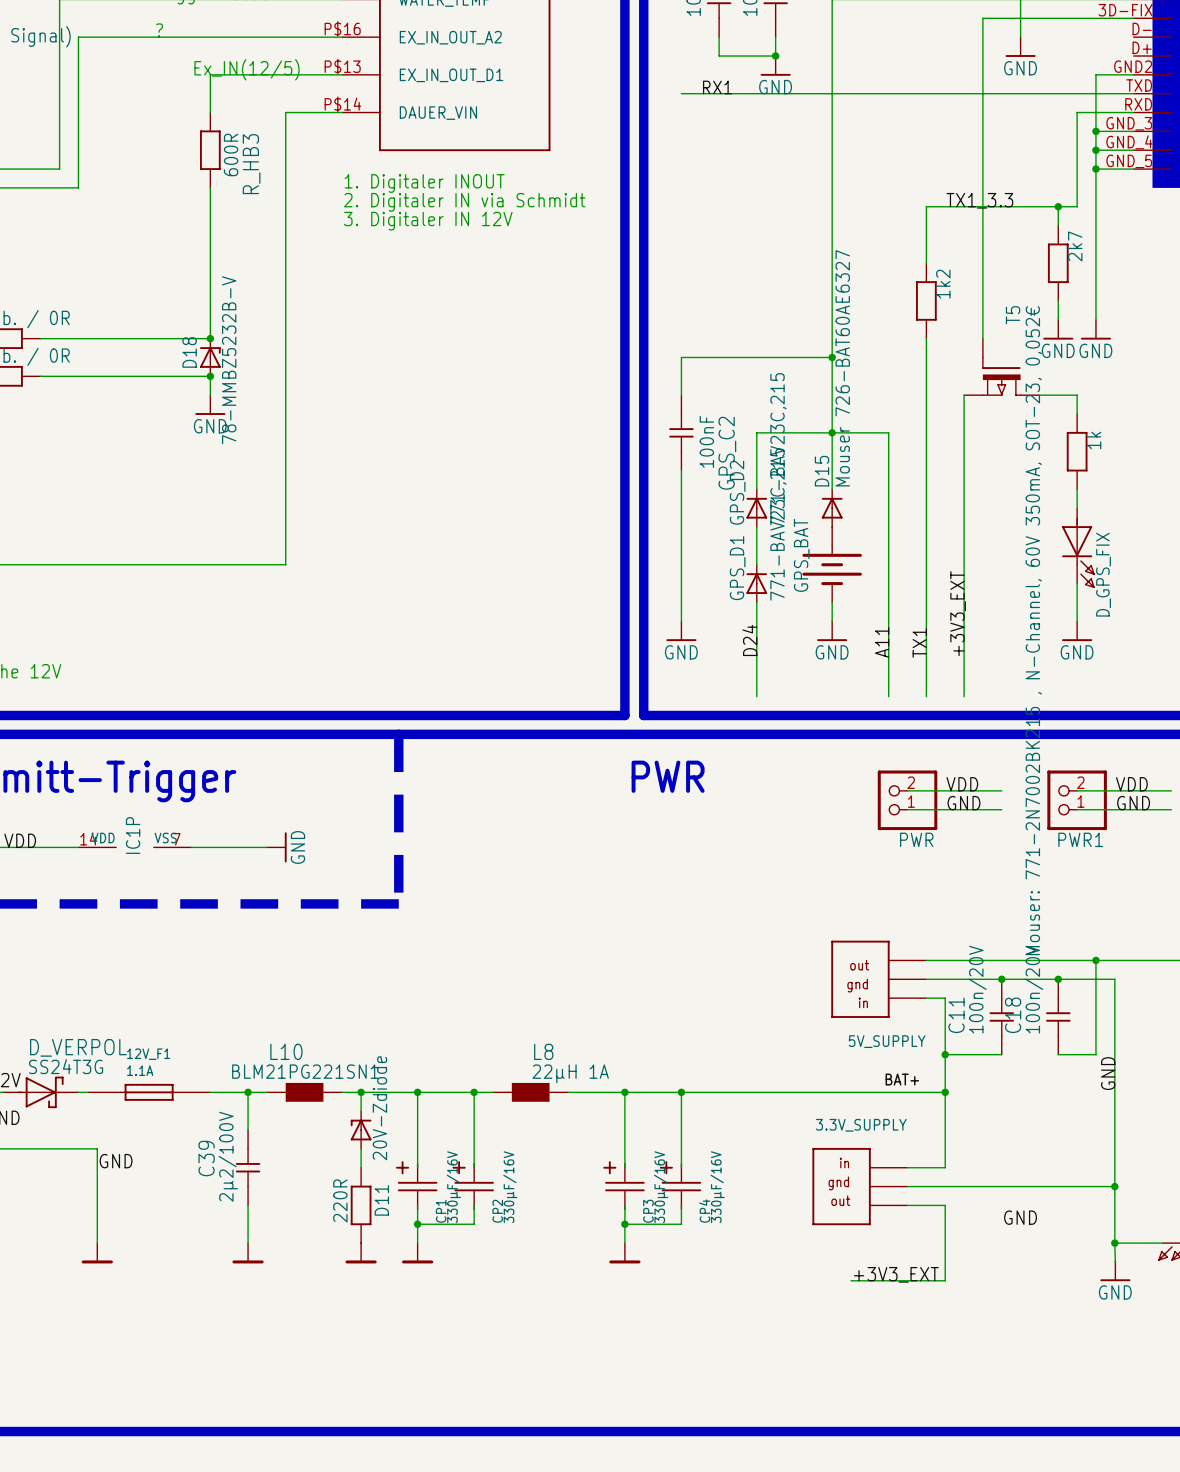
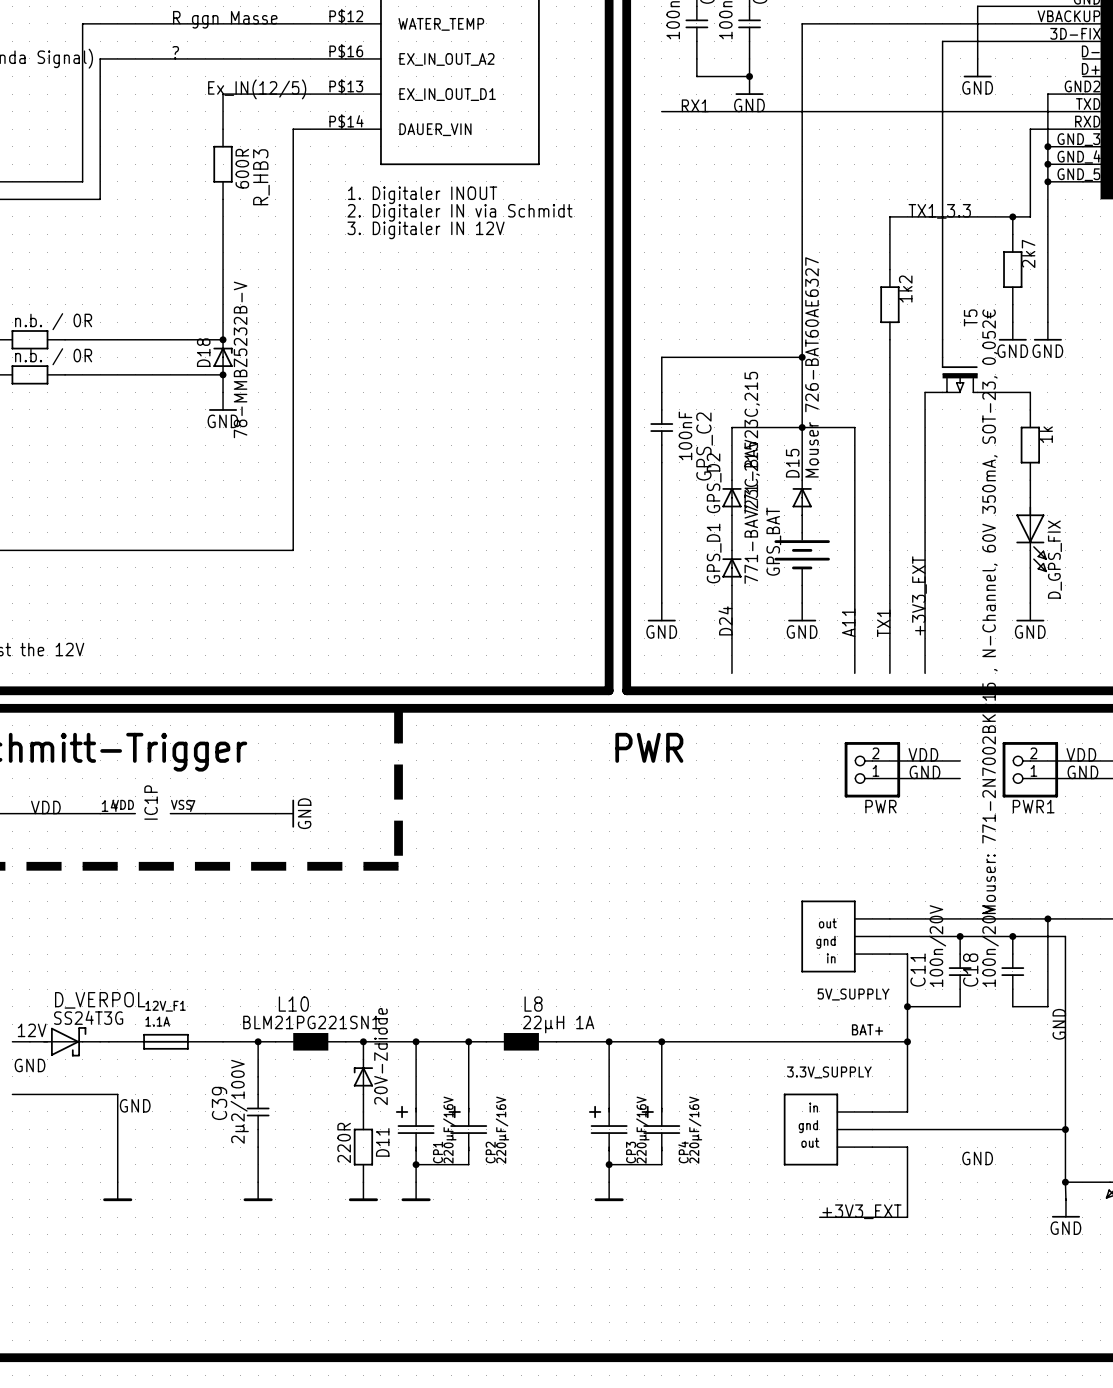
CP1 value: 330µF/16V (453, 1187) -> 220µF/16V (449, 1130)
CP2 value: 330µF/16V (510, 1187) -> 220µF/16V (502, 1130)
CP3 value: 330µF/16V (661, 1187) -> 220µF/16V (642, 1130)
CP4 value: 330µF/16V (717, 1187) -> 220µF/16V (695, 1130)

